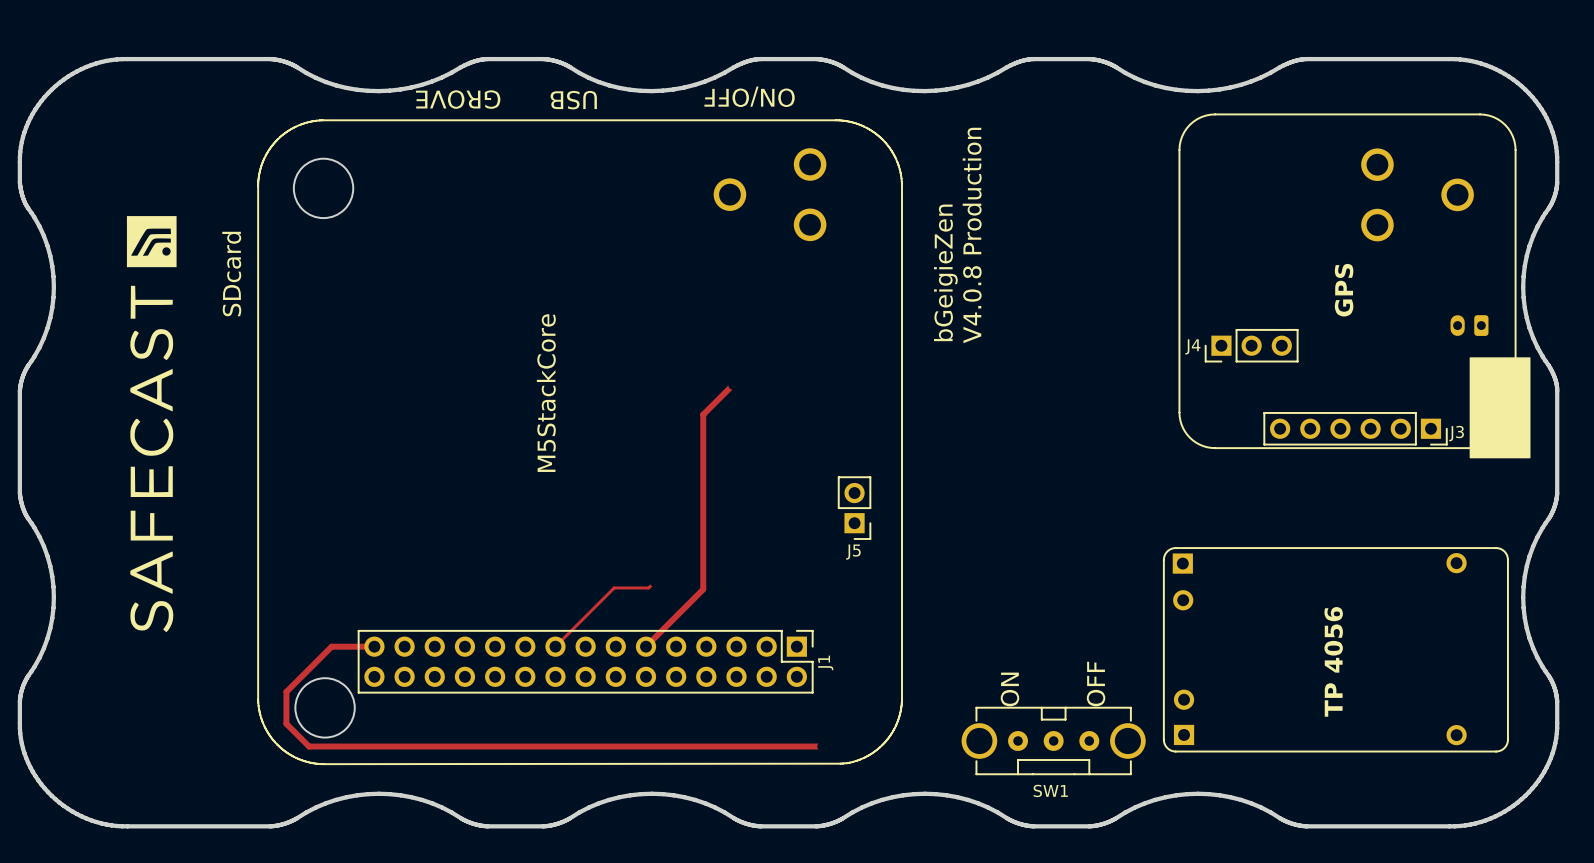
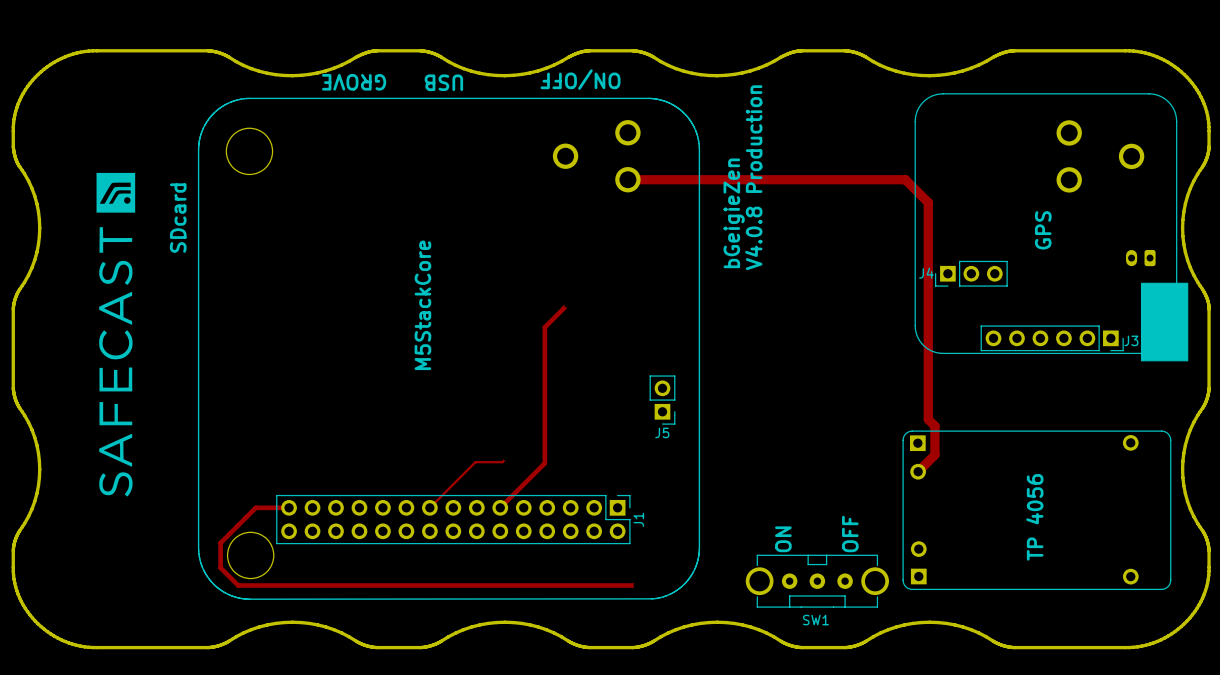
track: none -> (627, 179) (905, 179) (928, 202) (928, 419) (934, 426) (934, 454) (918, 471)

